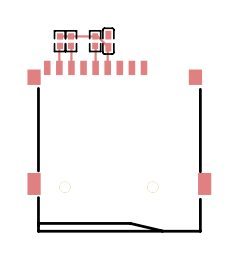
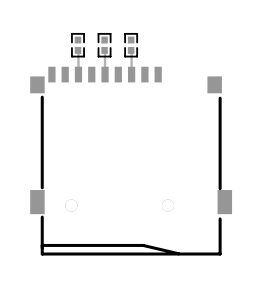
part footprint: [102, 27, 115, 55] -> [124, 32, 139, 58]
track: (60, 36) (97, 36) (108, 47) (107, 67) -> none
part: (60, 41) -> none
track: (60, 45) (59, 67) -> none
track: none -> (131, 50) (131, 74)

